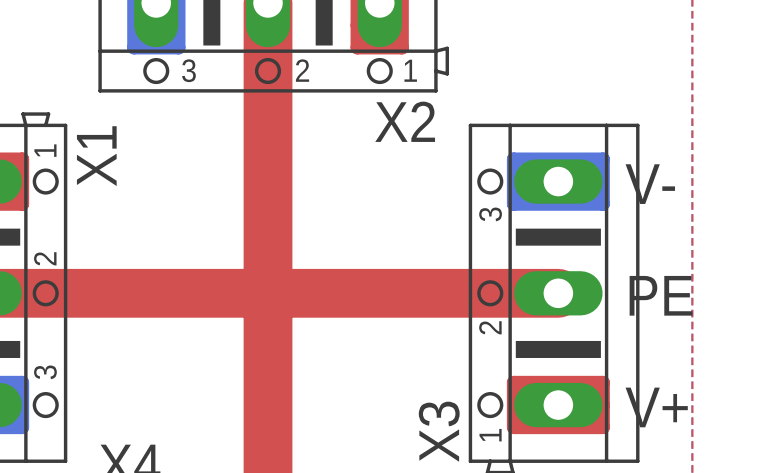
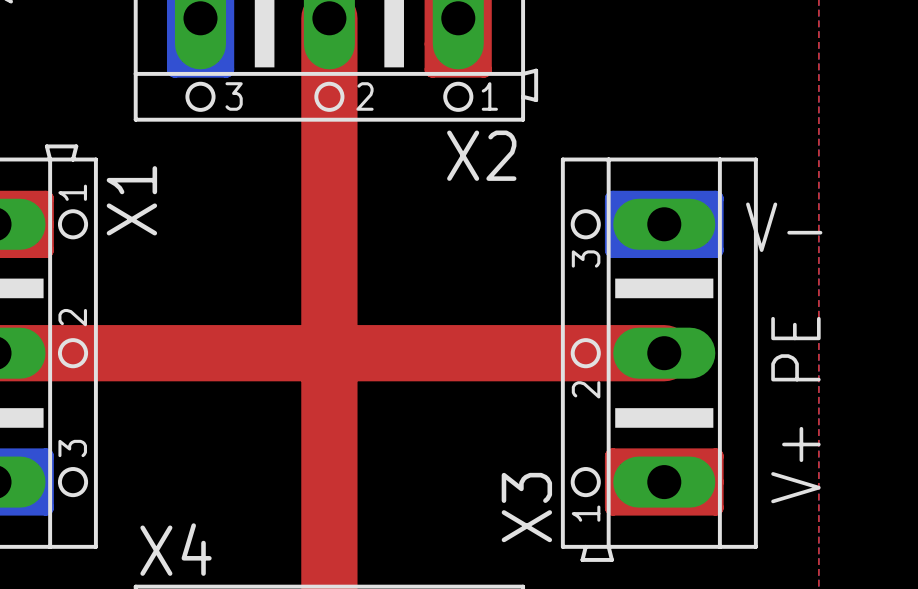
text rotation: 0° (661, 295) -> 90° counterclockwise (795, 349)
text rotation: 0° (656, 407) -> 90° counterclockwise (795, 465)

